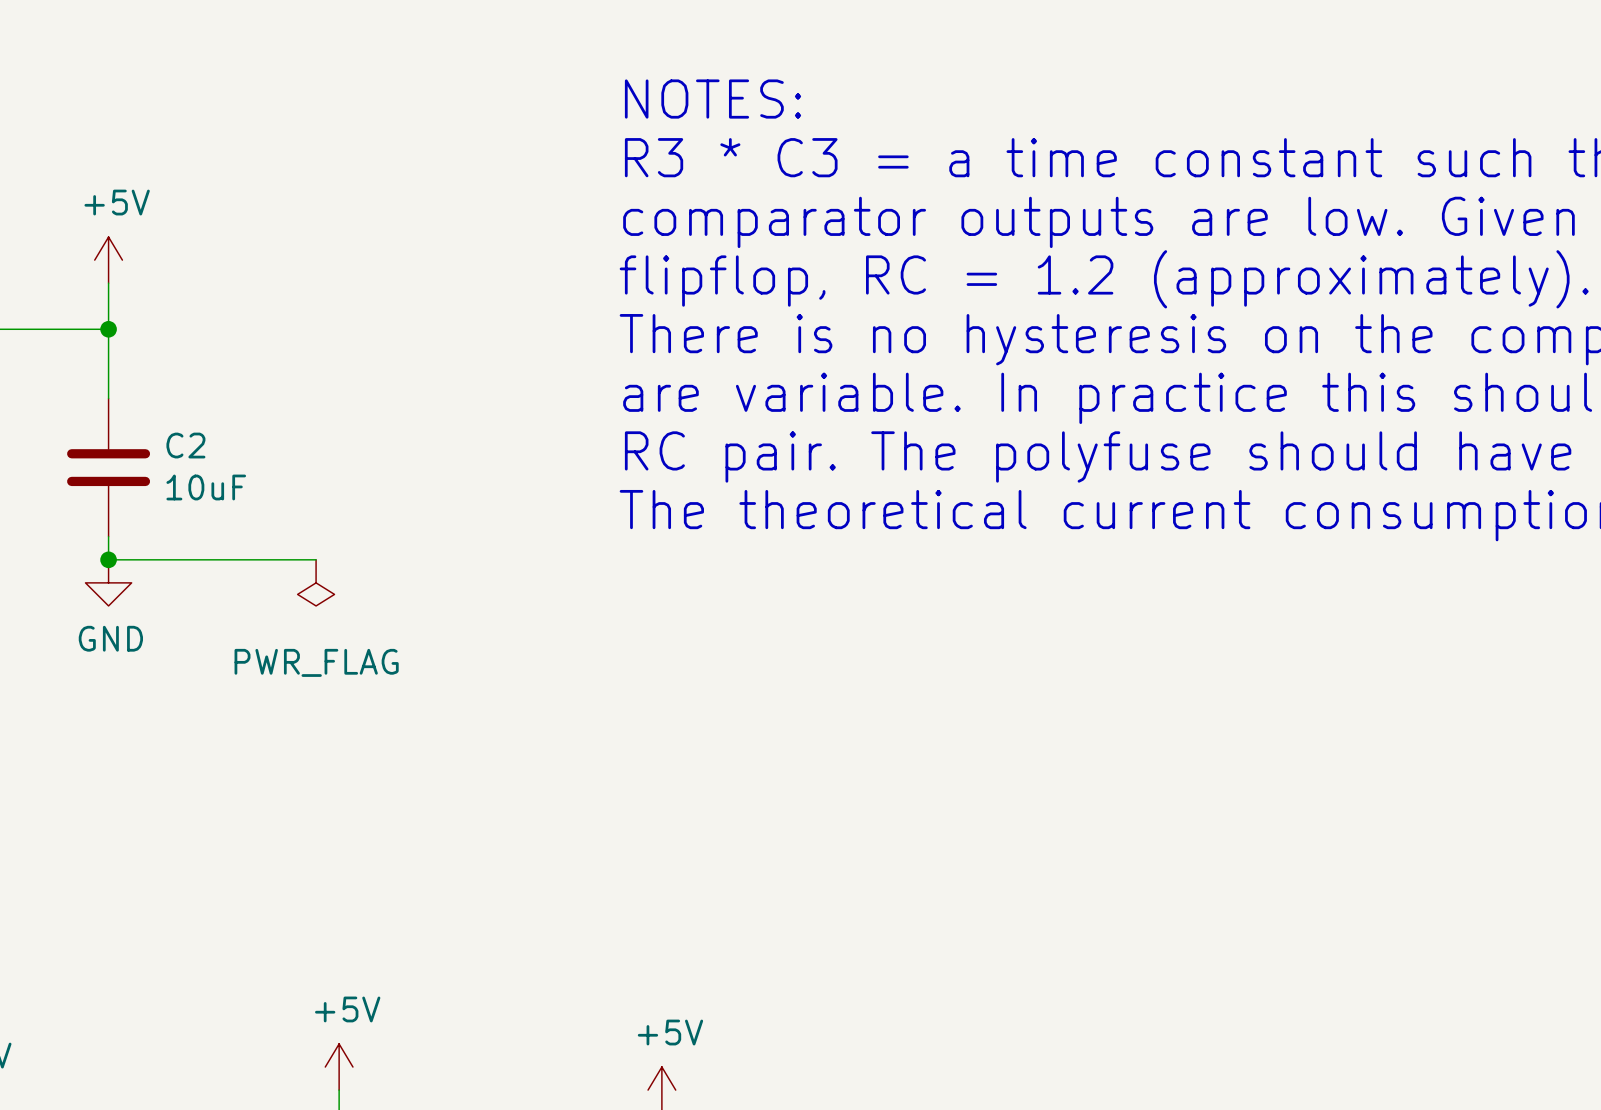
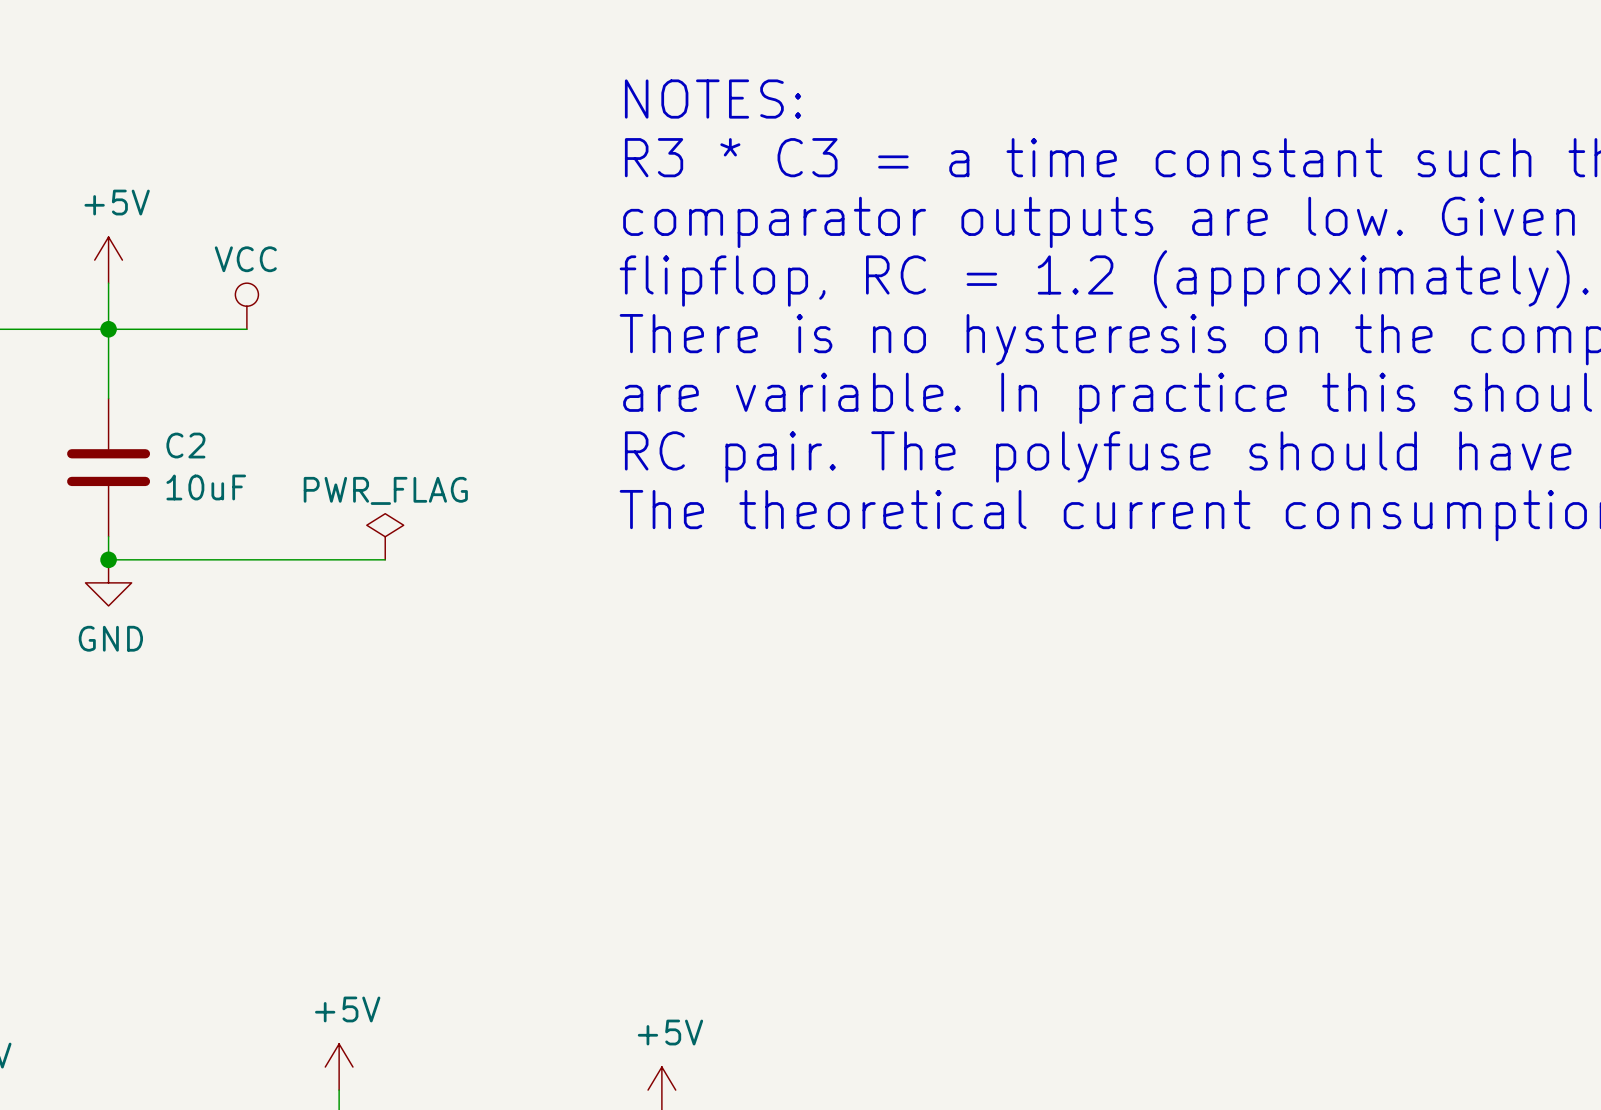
power symbol: none -> VCC (246, 306)
wire: none -> (108, 329) (246, 329)
wire: none -> (316, 559) (385, 559)
power symbol rotation: 0° (316, 582) -> 180° (385, 536)
power symbol position: PWR_FLAG (316, 582) -> PWR_FLAG (385, 536)

